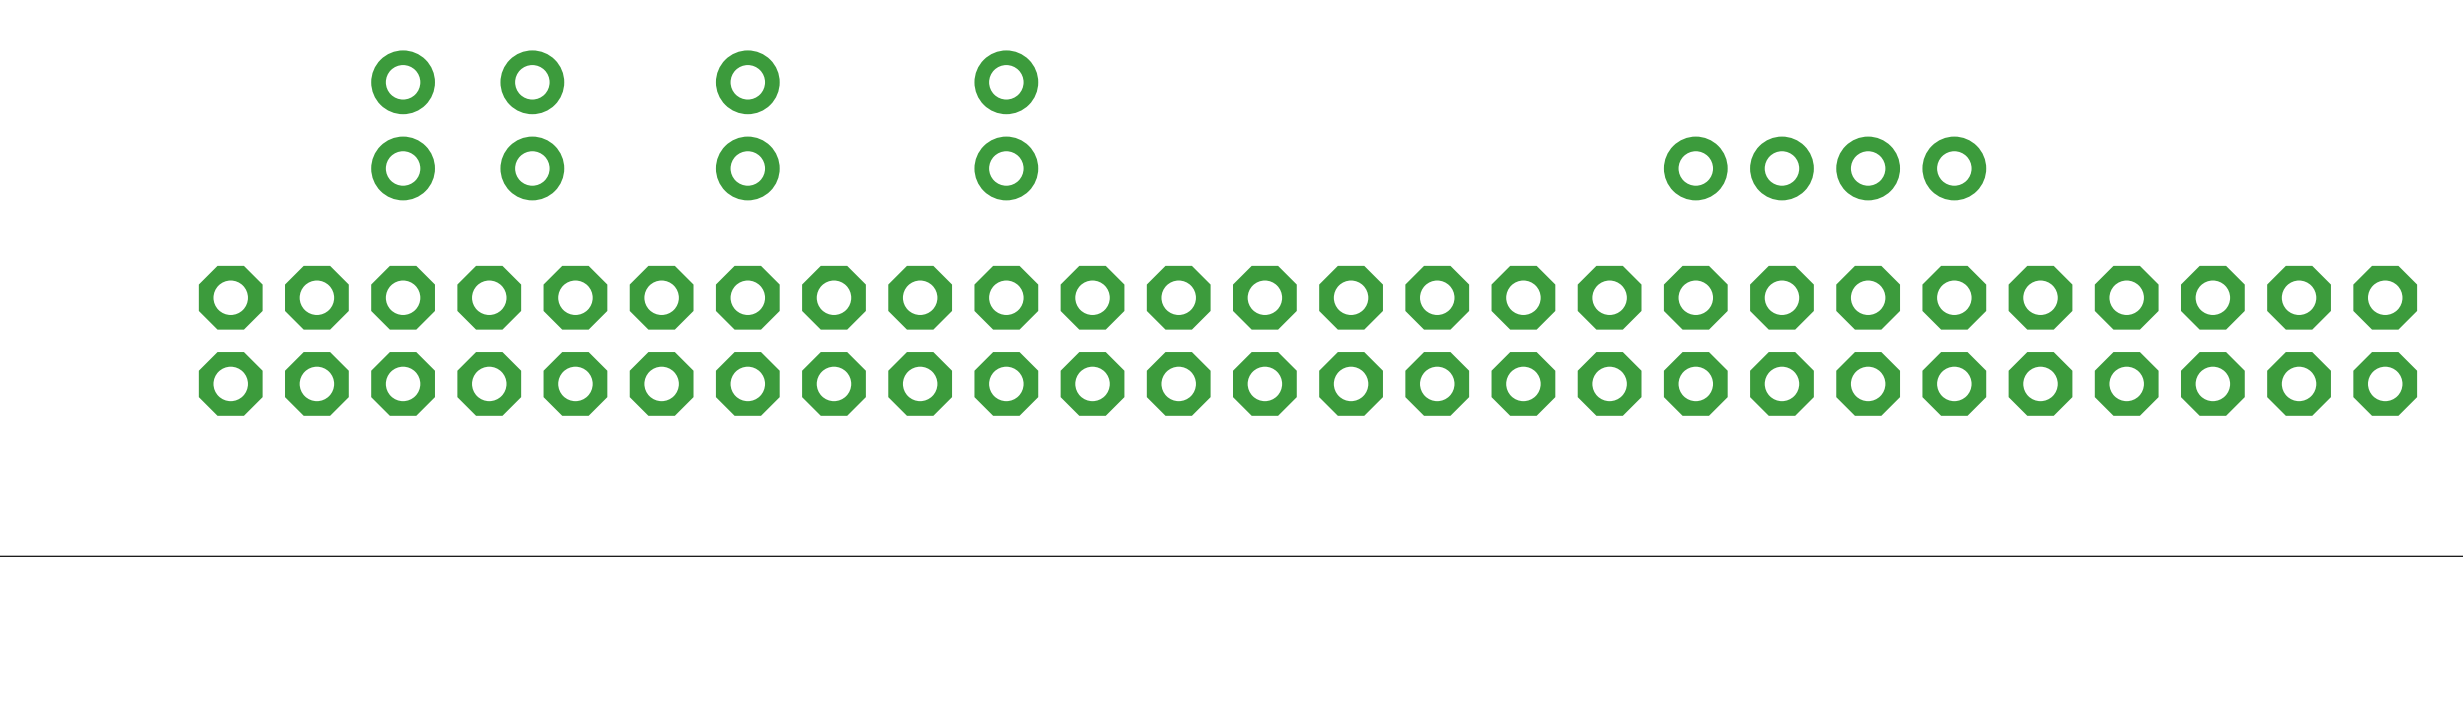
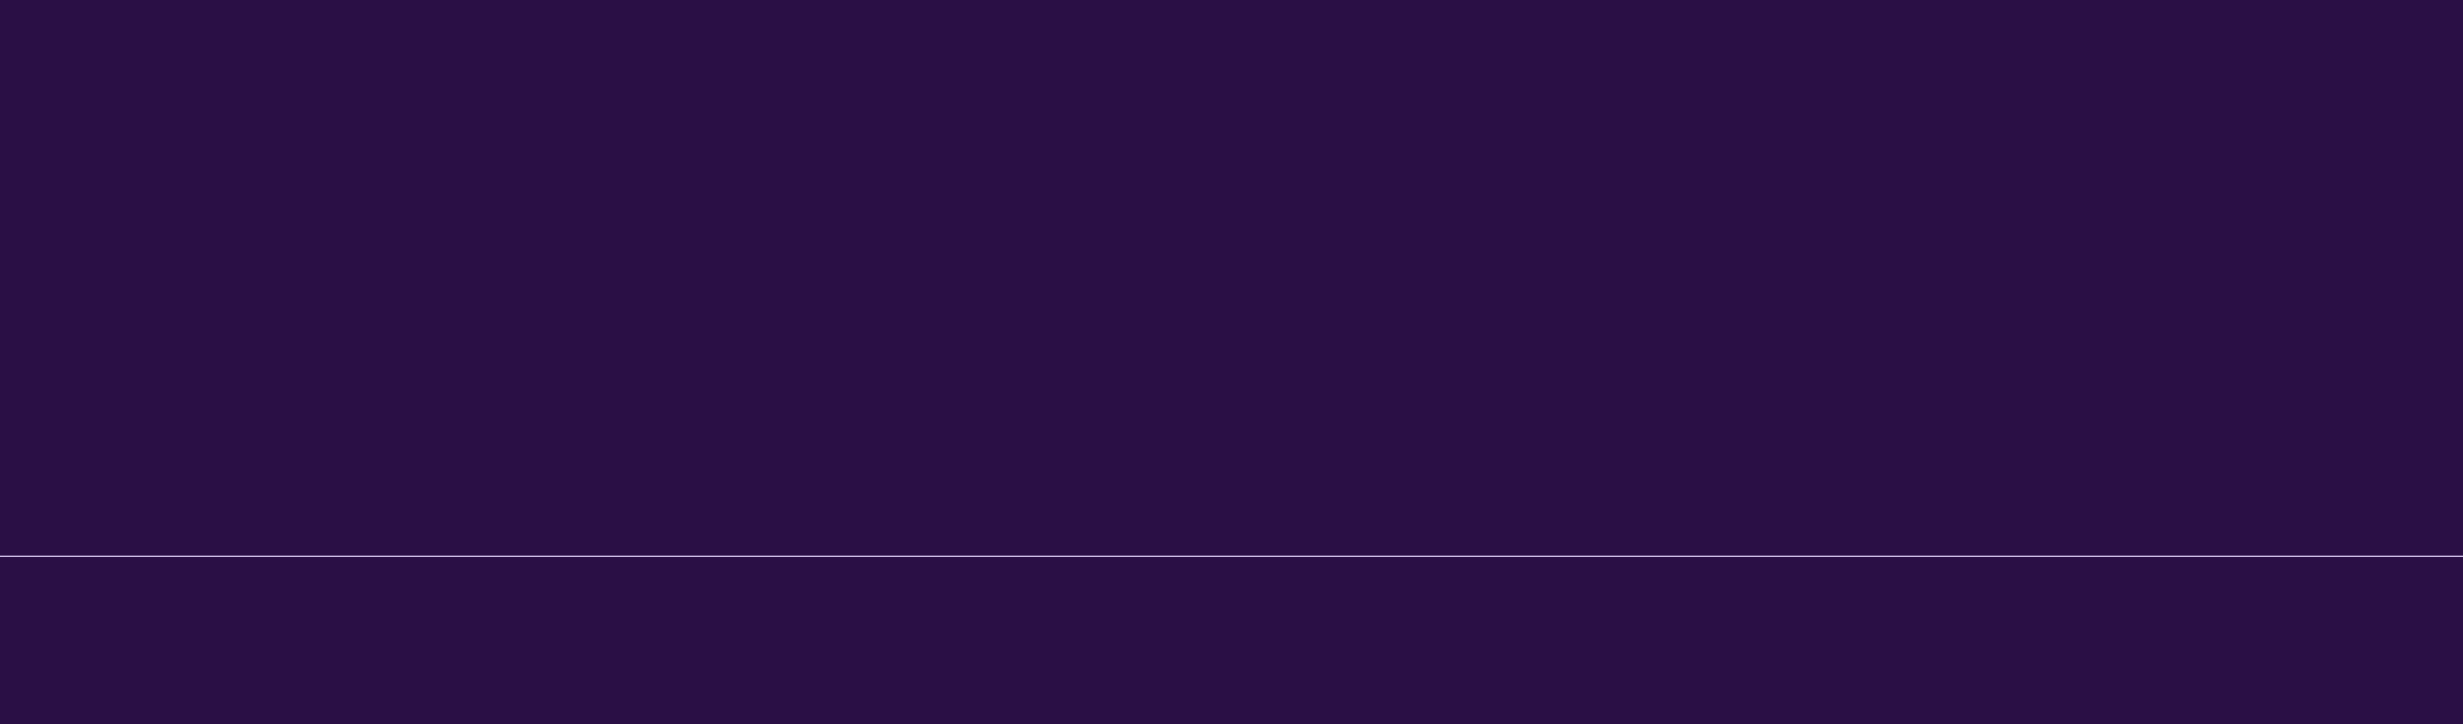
part: (403, 125) -> none
part: (532, 125) -> none
part: (747, 125) -> none
part: (1006, 125) -> none
part: (1825, 168) -> none
part: (1307, 340) -> none

